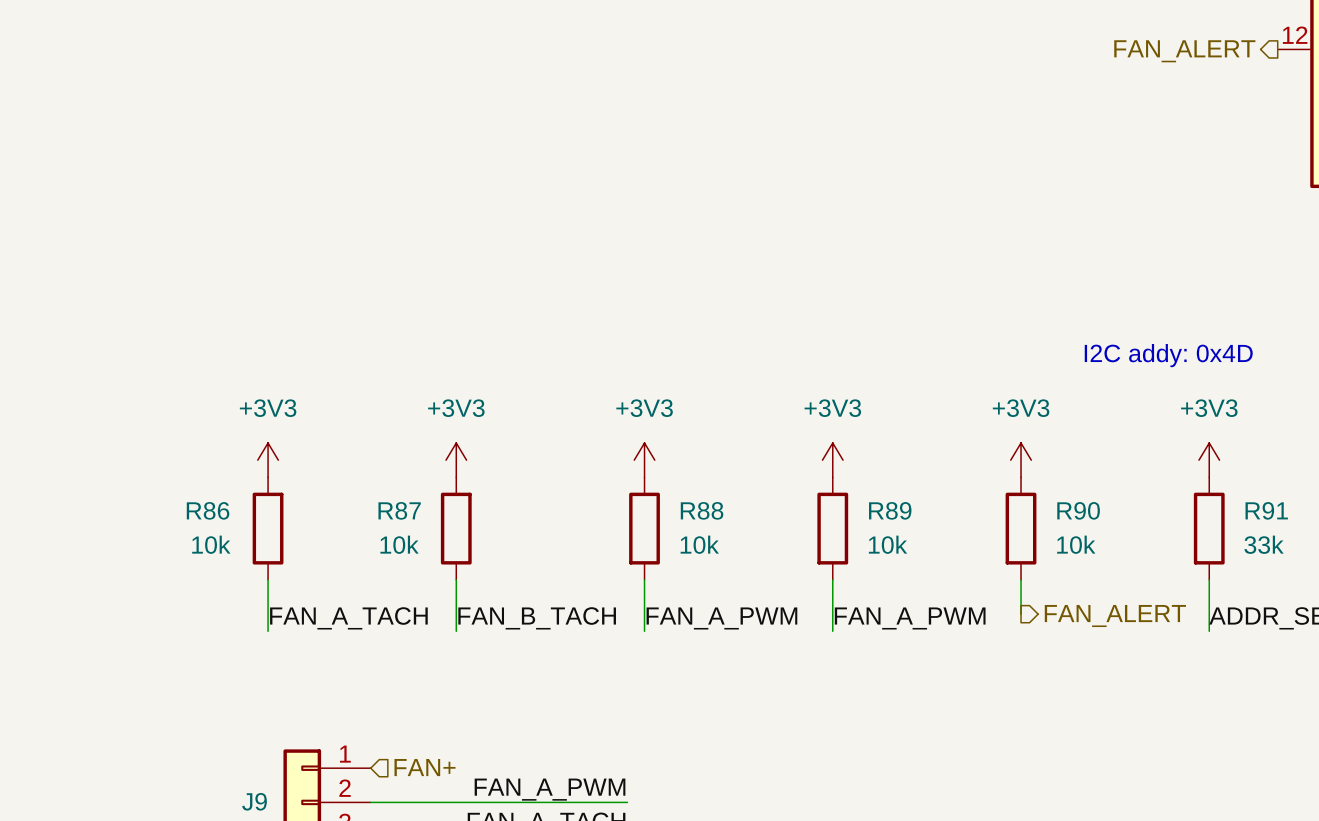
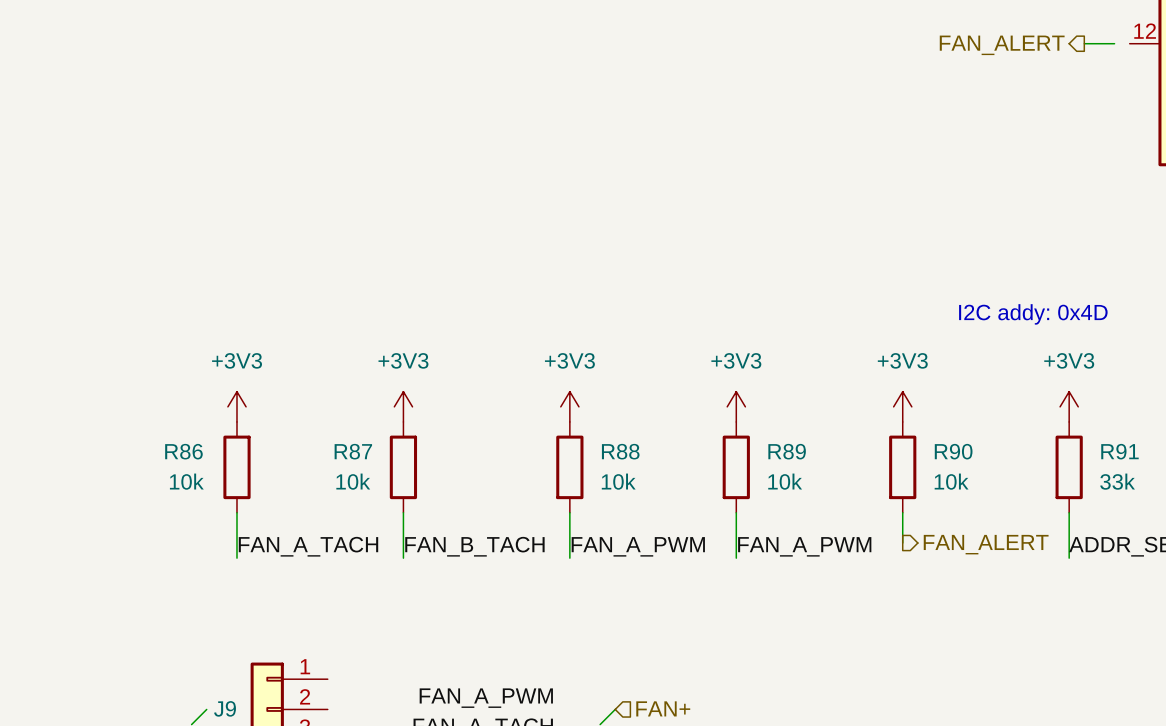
wire: none -> (1084, 43) (1114, 43)
hierarchical label position: FAN_ALERT (1184, 51) -> FAN_ALERT (1002, 45)
hierarchical label: FAN+ (425, 767) -> none
hierarchical label: none -> FAN+ (663, 708)
wire: none -> (206, 709) (191, 724)
wire: (370, 802) (627, 802) -> none
wire: none -> (615, 709) (600, 724)

